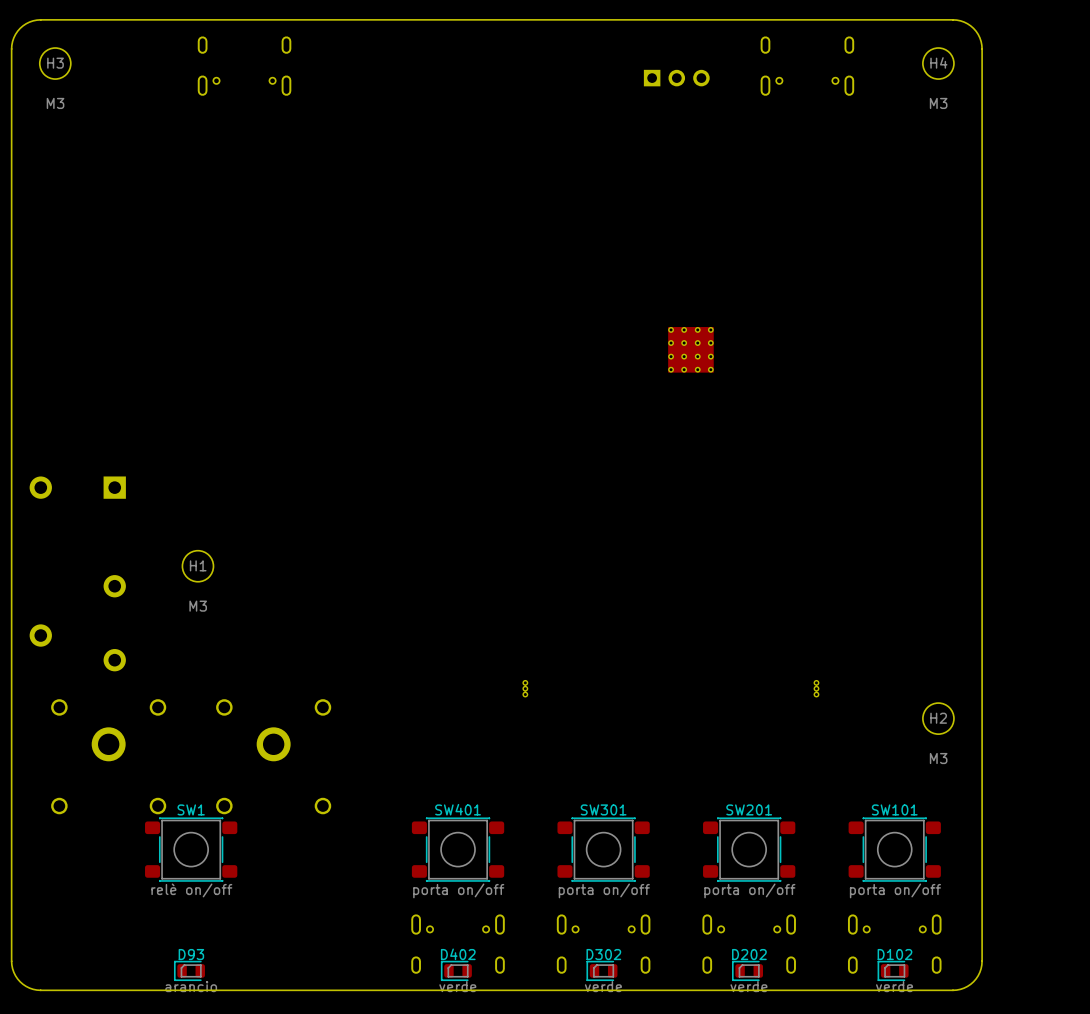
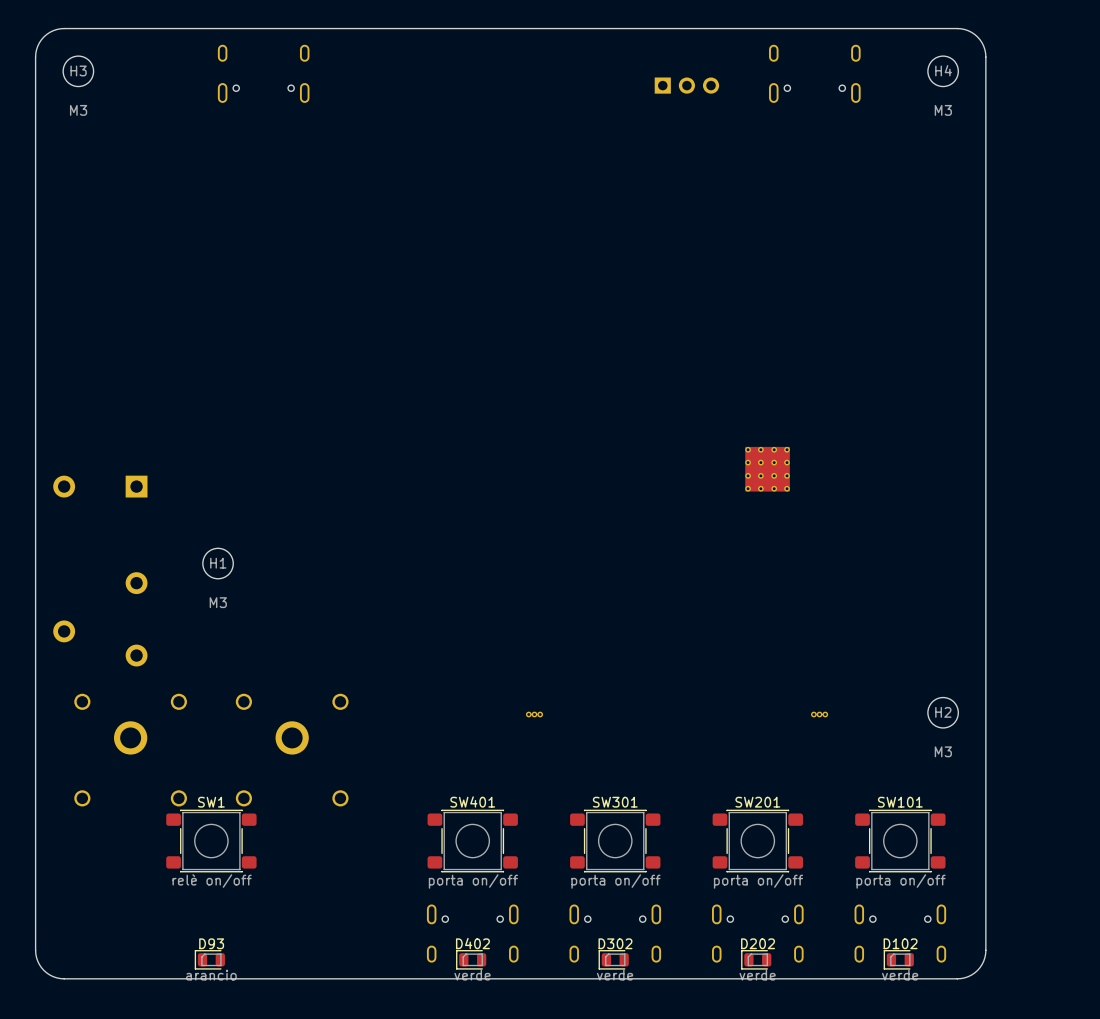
part position: (690, 349) -> (767, 469)
part rotation: 0° (525, 688) -> 90° clockwise (534, 714)
part position: (525, 688) -> (534, 714)
part rotation: 0° (816, 688) -> 90° clockwise (819, 714)
part position: (816, 688) -> (819, 714)

